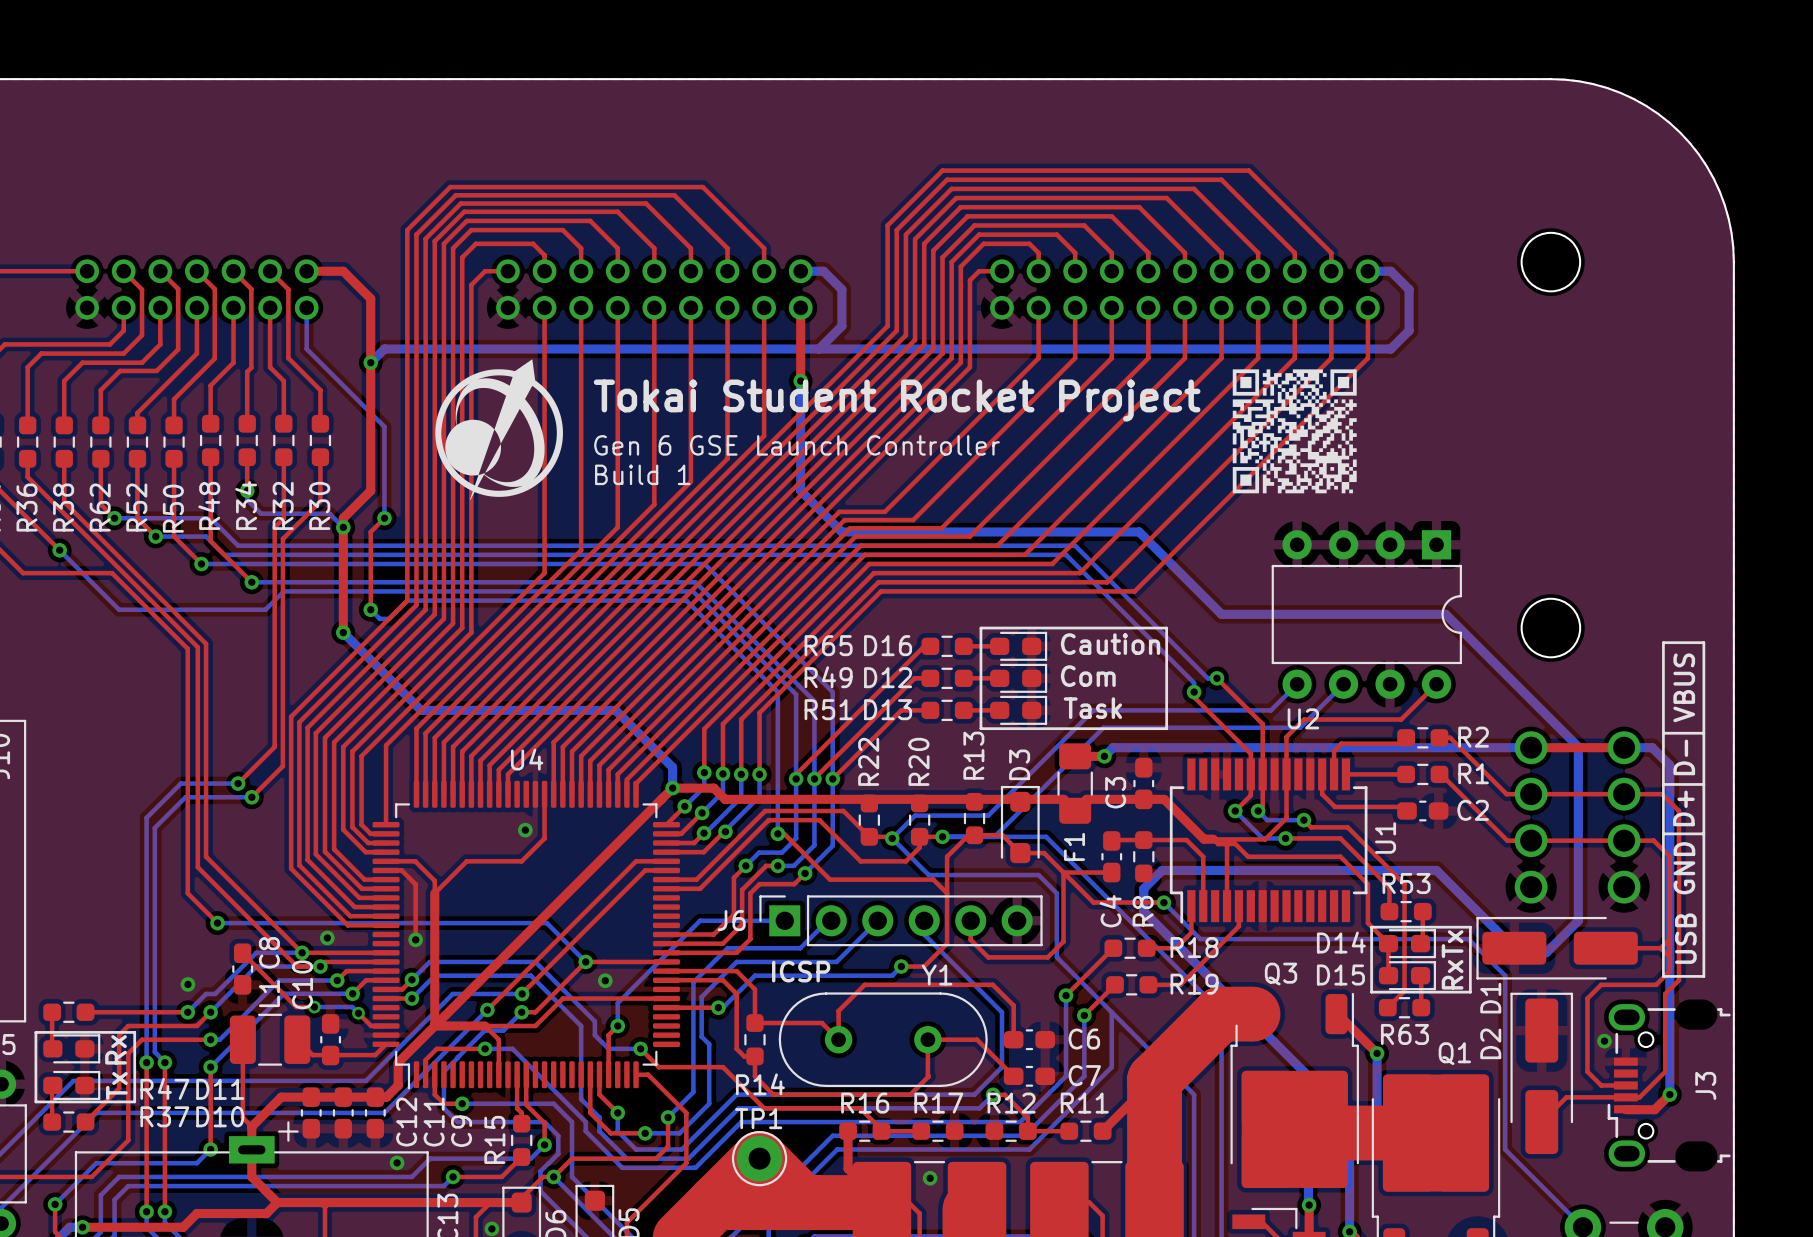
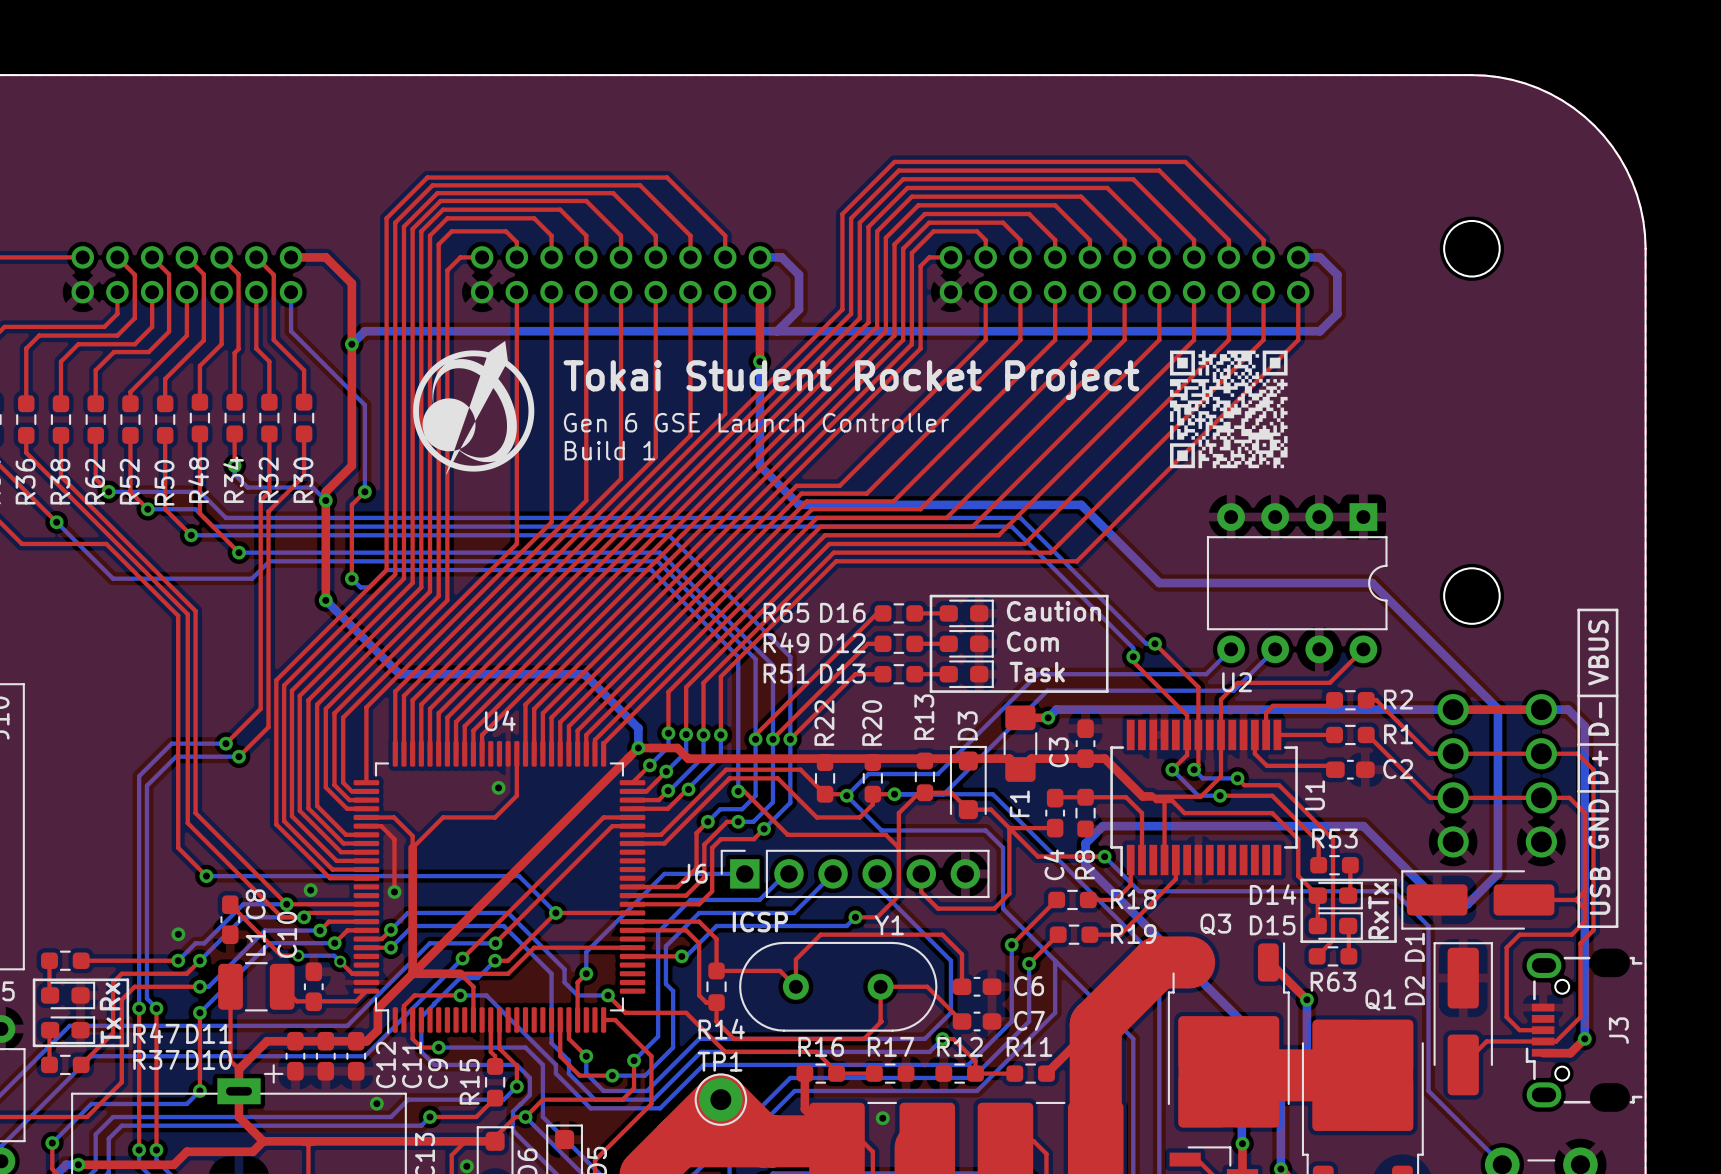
via: (605, 980) -> none
via: (1604, 1041) -> none

